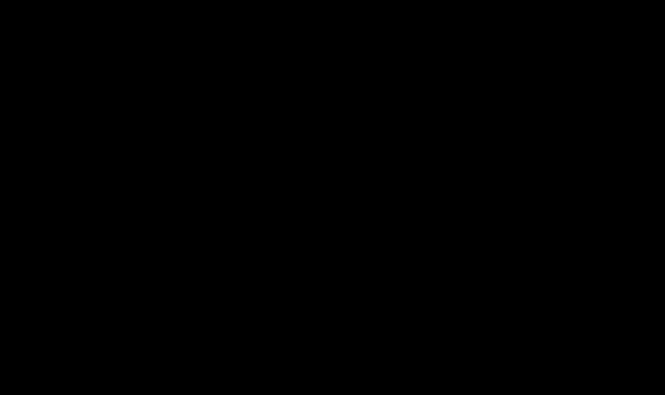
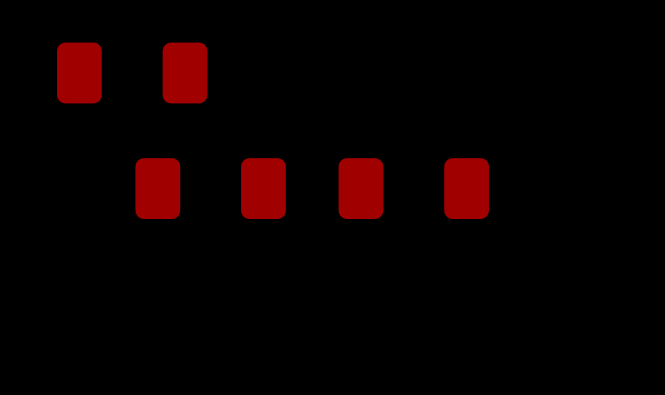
part: none -> (132, 72)
part: none -> (210, 188)
part: none -> (413, 188)

